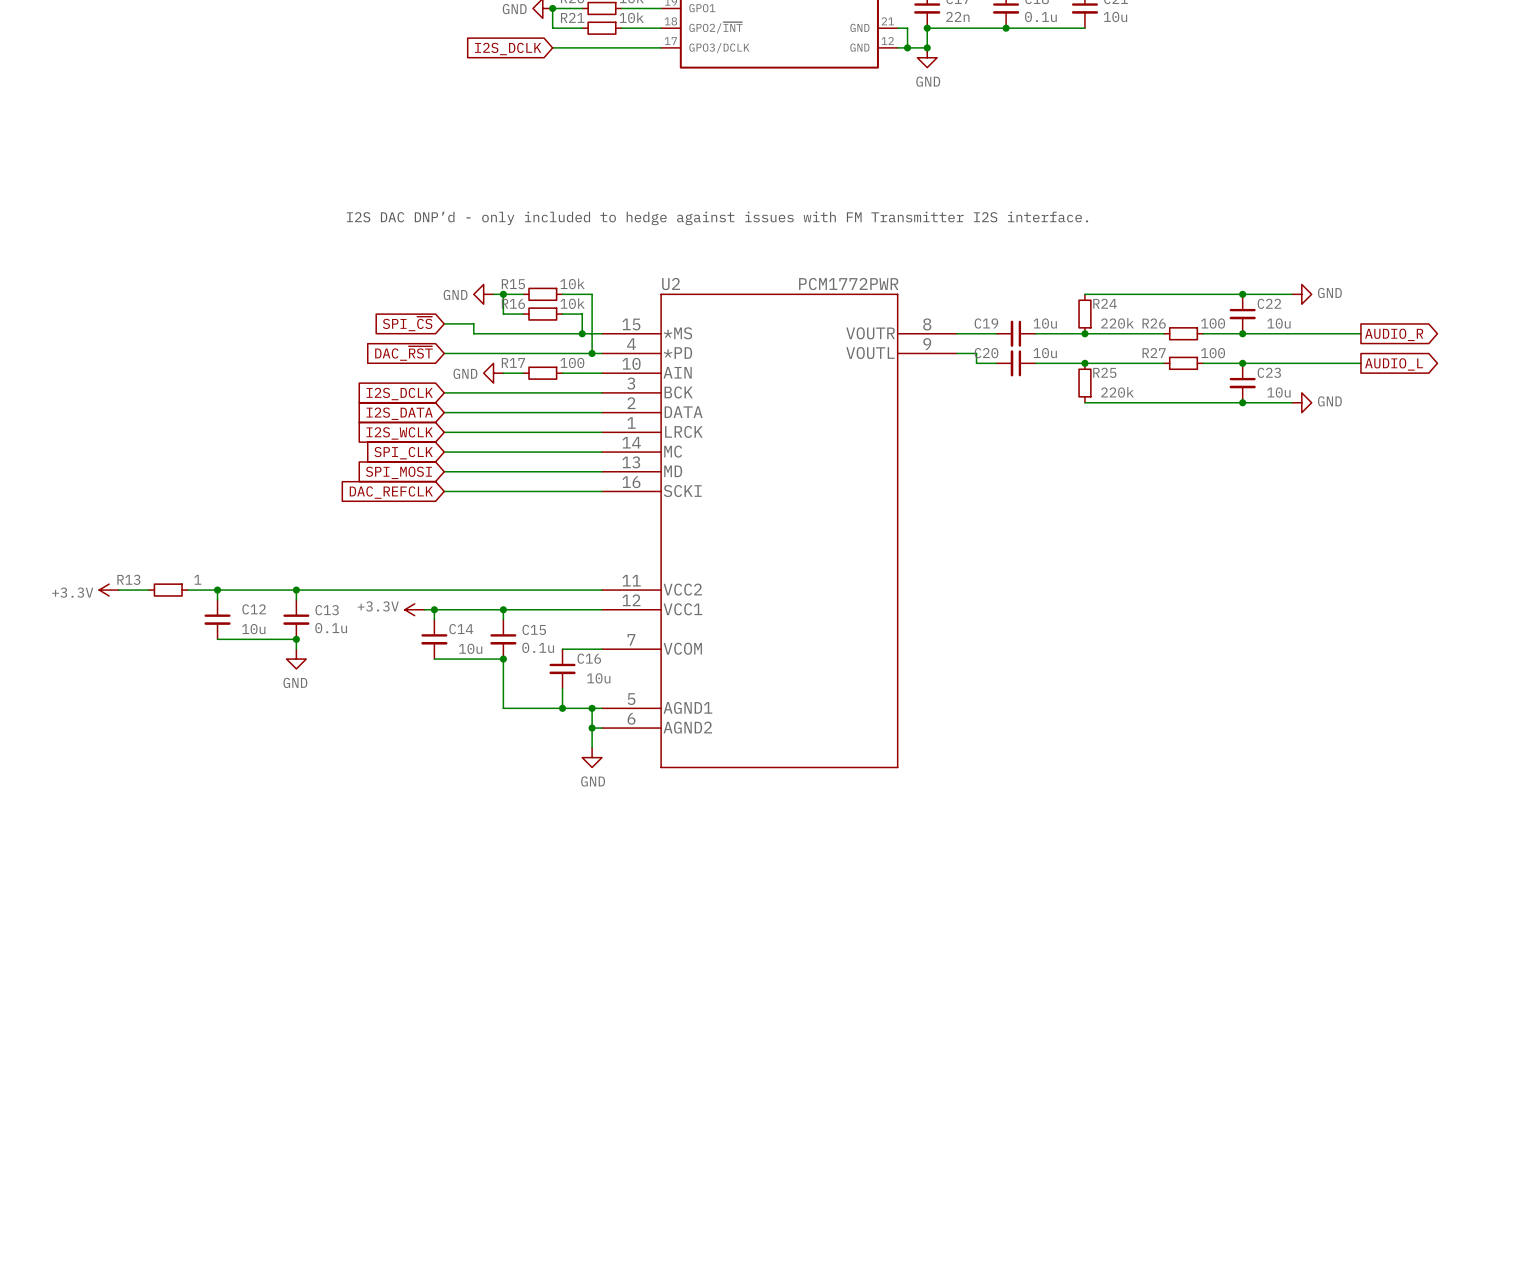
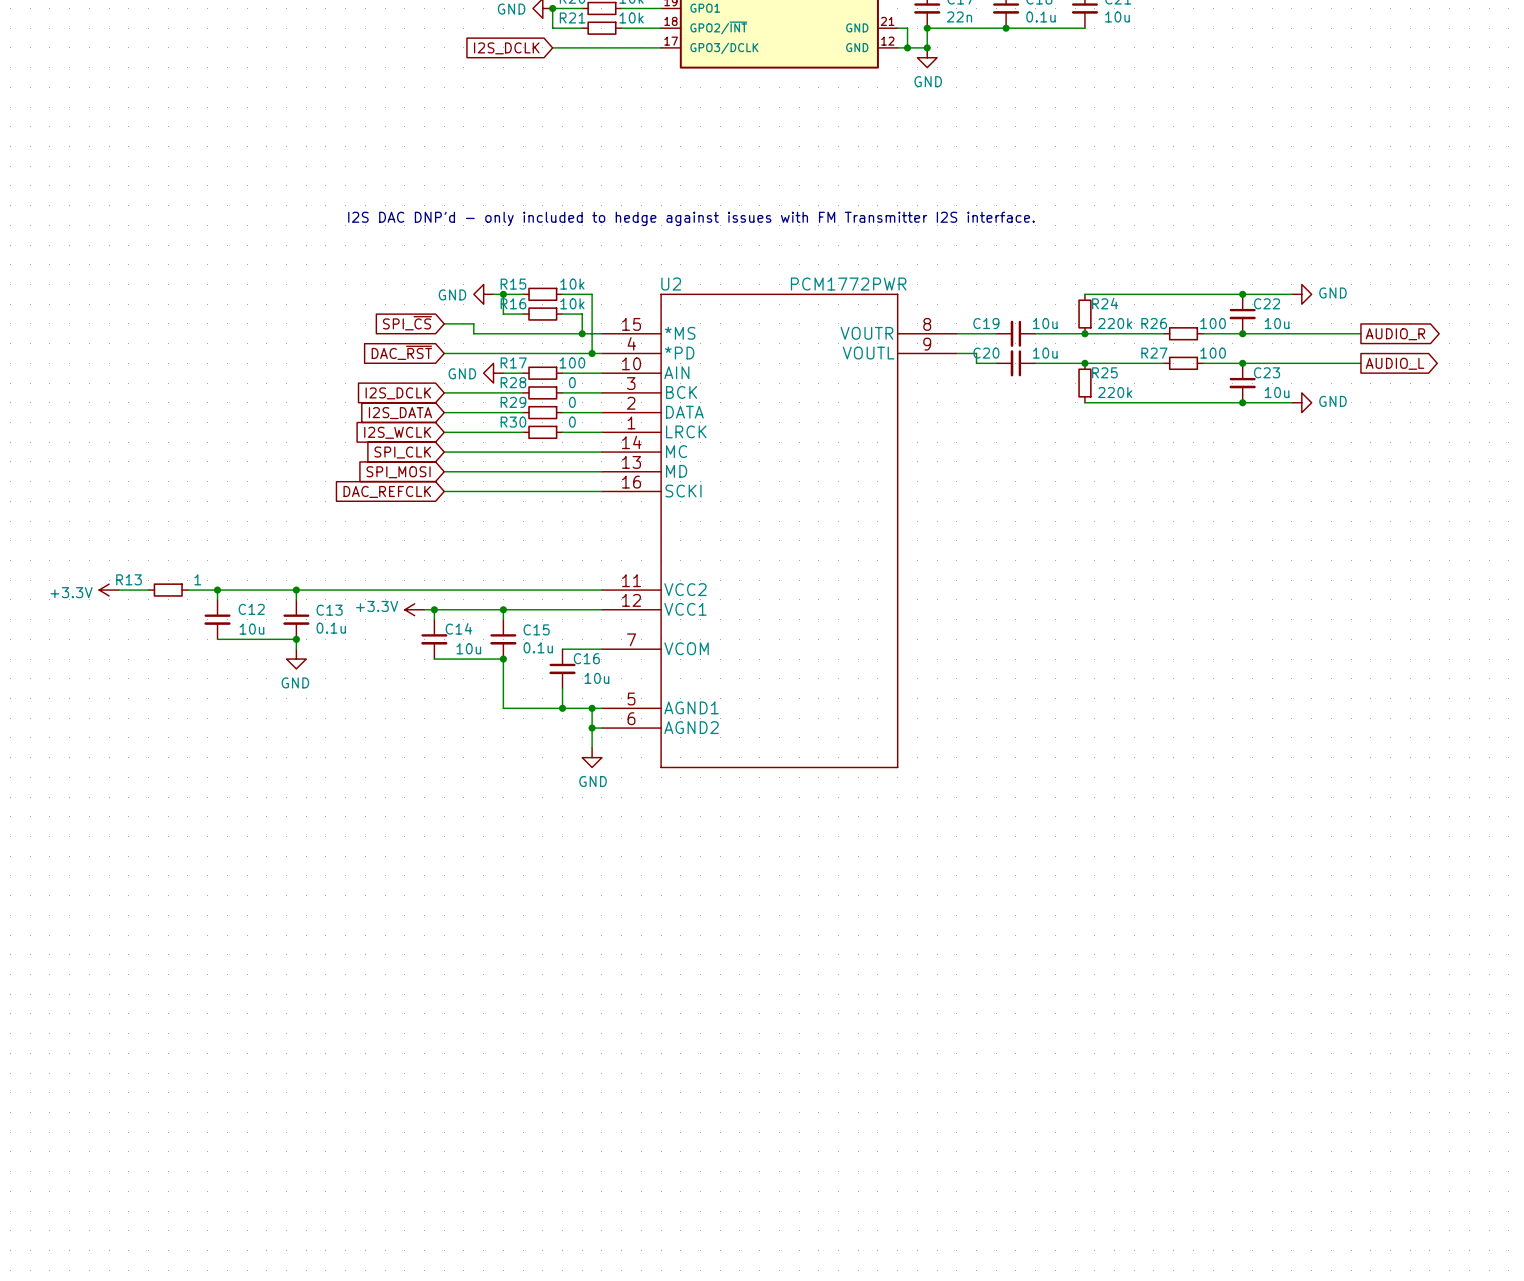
wire: (523, 392) (562, 392) -> none
R28: none -> 0 (542, 392)
wire: (523, 412) (562, 412) -> none
R29: none -> 0 (542, 412)
wire: (523, 432) (562, 432) -> none
R30: none -> 0 (542, 432)

